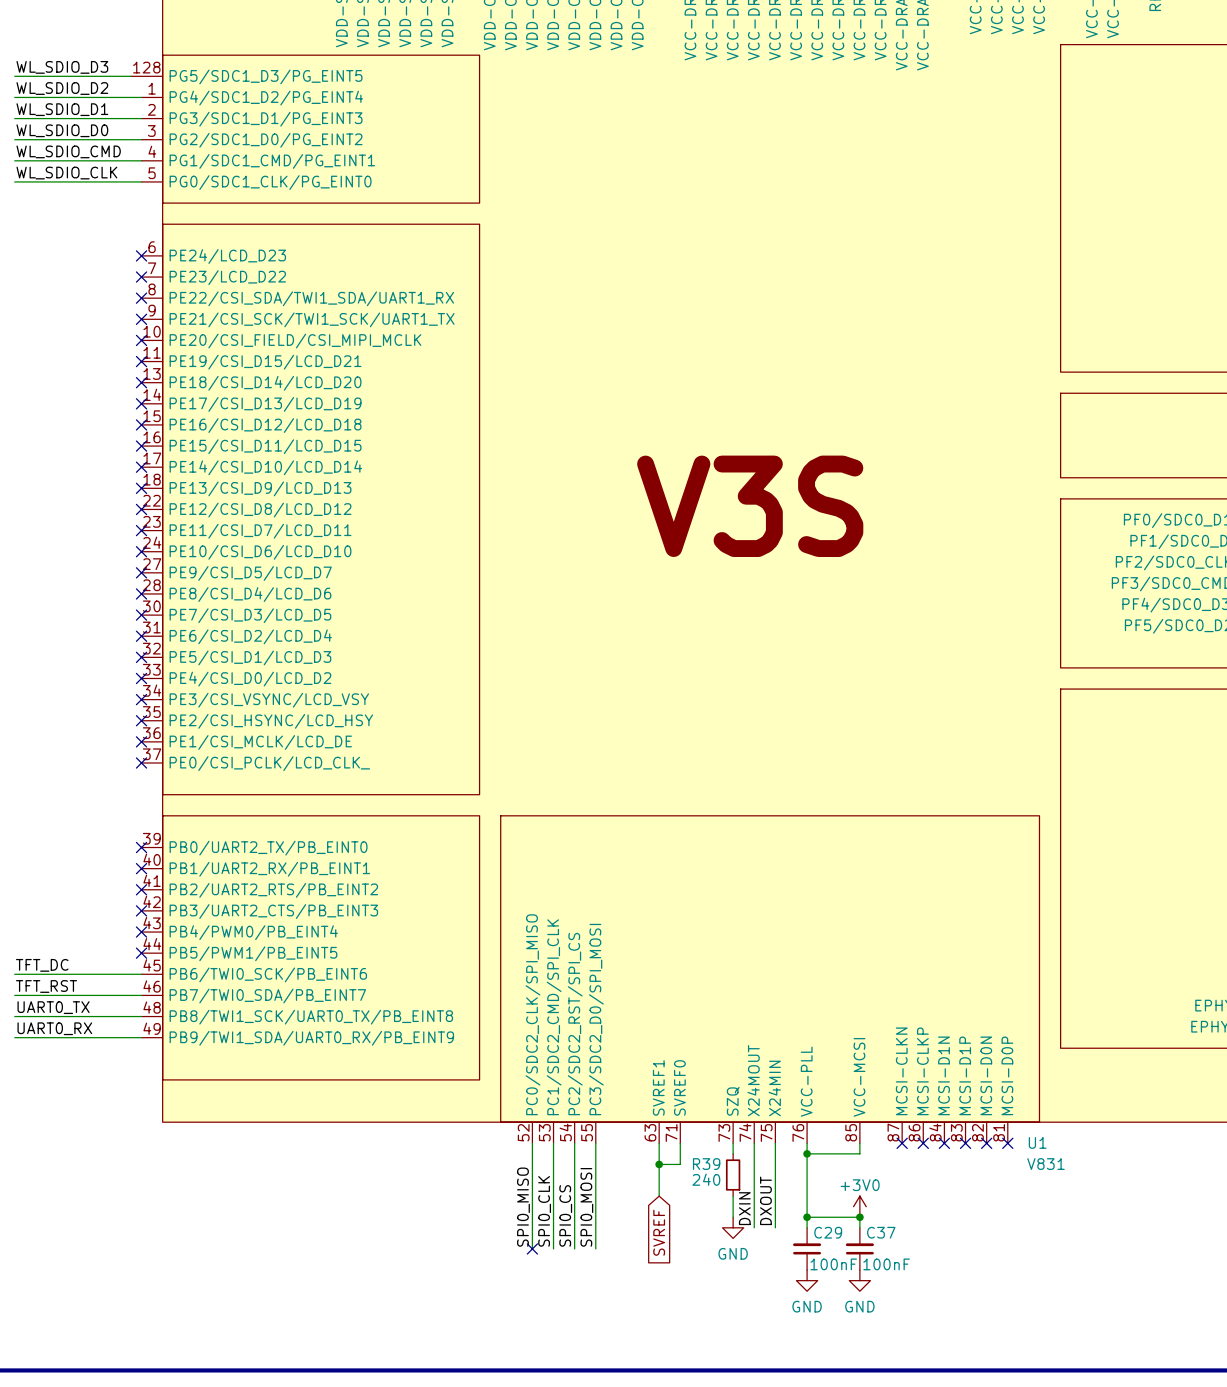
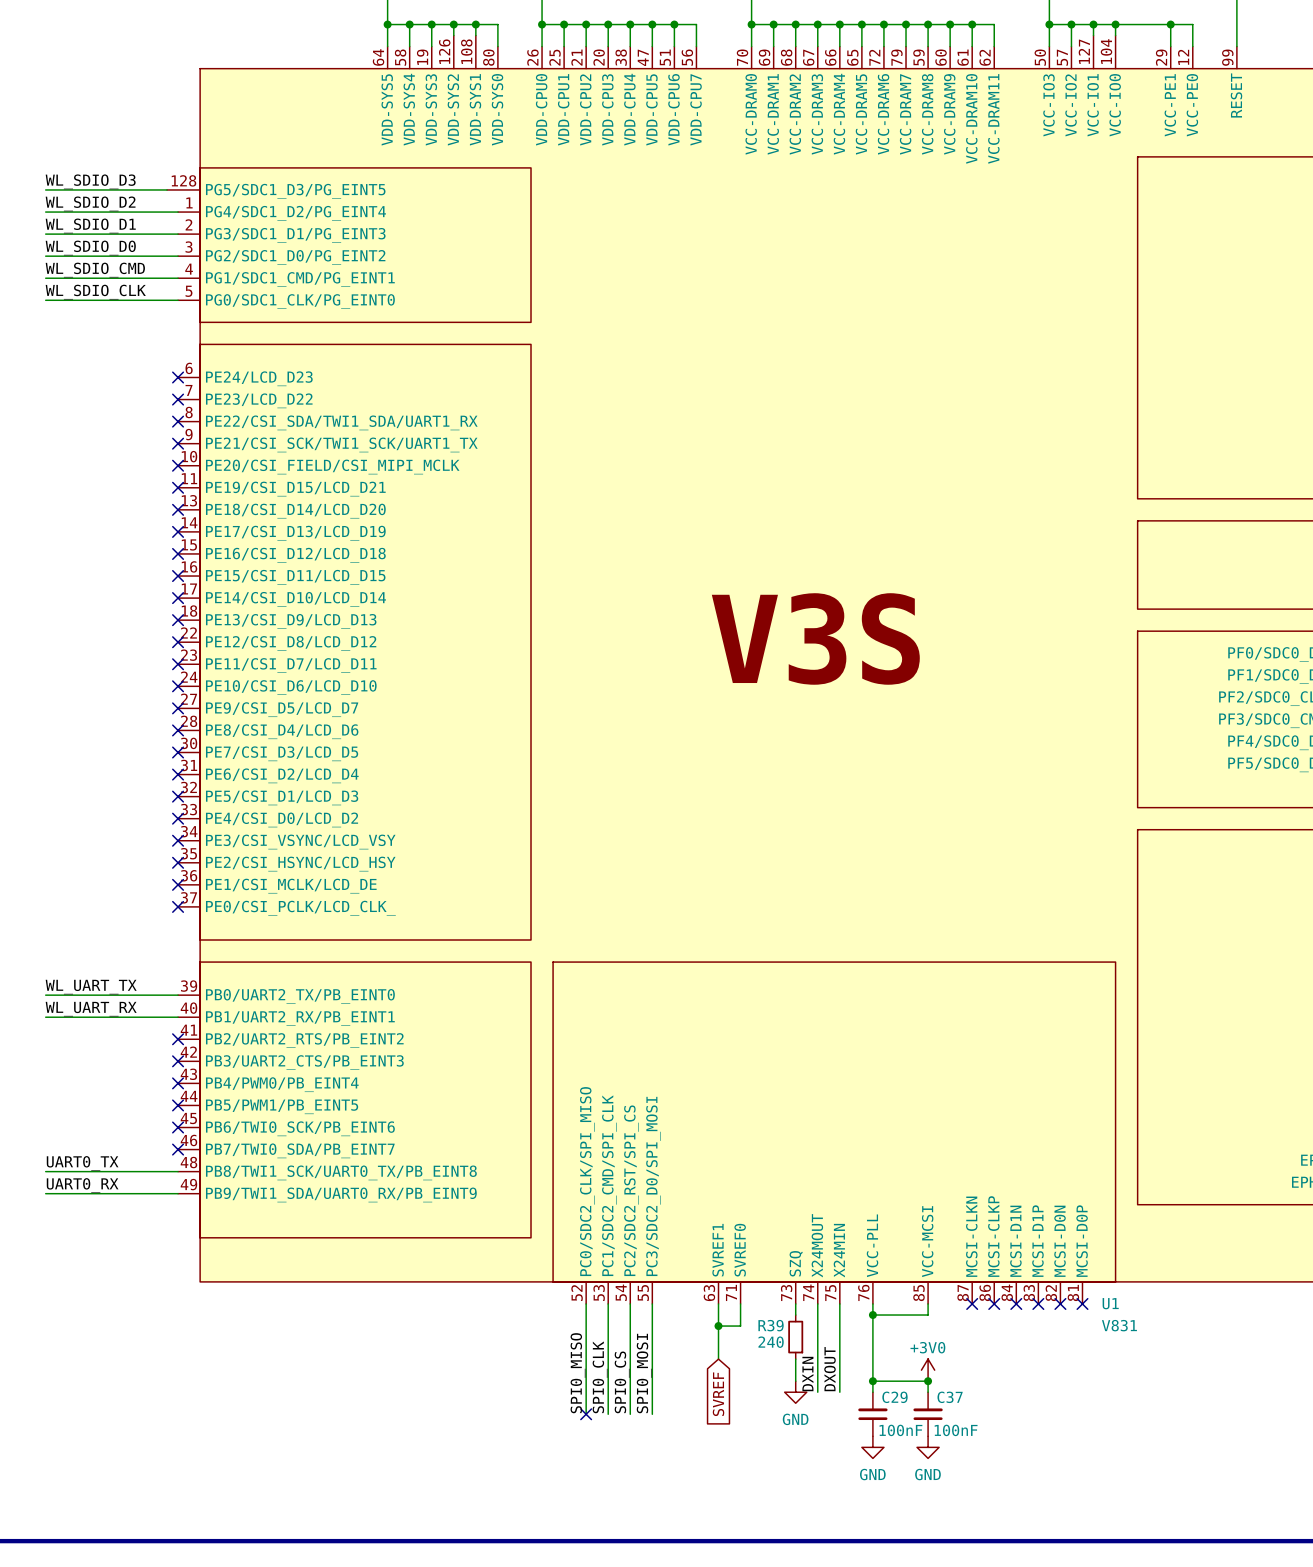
label: none -> WL_UART_TX (91, 987)
no-connect mark: (141, 847) -> none
label: none -> WL_UART_RX (91, 1009)
no-connect mark: (141, 868) -> none
label: TFT_DC (42, 965) -> none
wire: (14, 974) (141, 974) -> (45, 1017) (178, 1017)
no-connect mark: none -> (178, 1127)
label: TFT_RST (46, 986) -> none
wire: (14, 995) (141, 995) -> (45, 995) (178, 995)
no-connect mark: none -> (178, 1149)

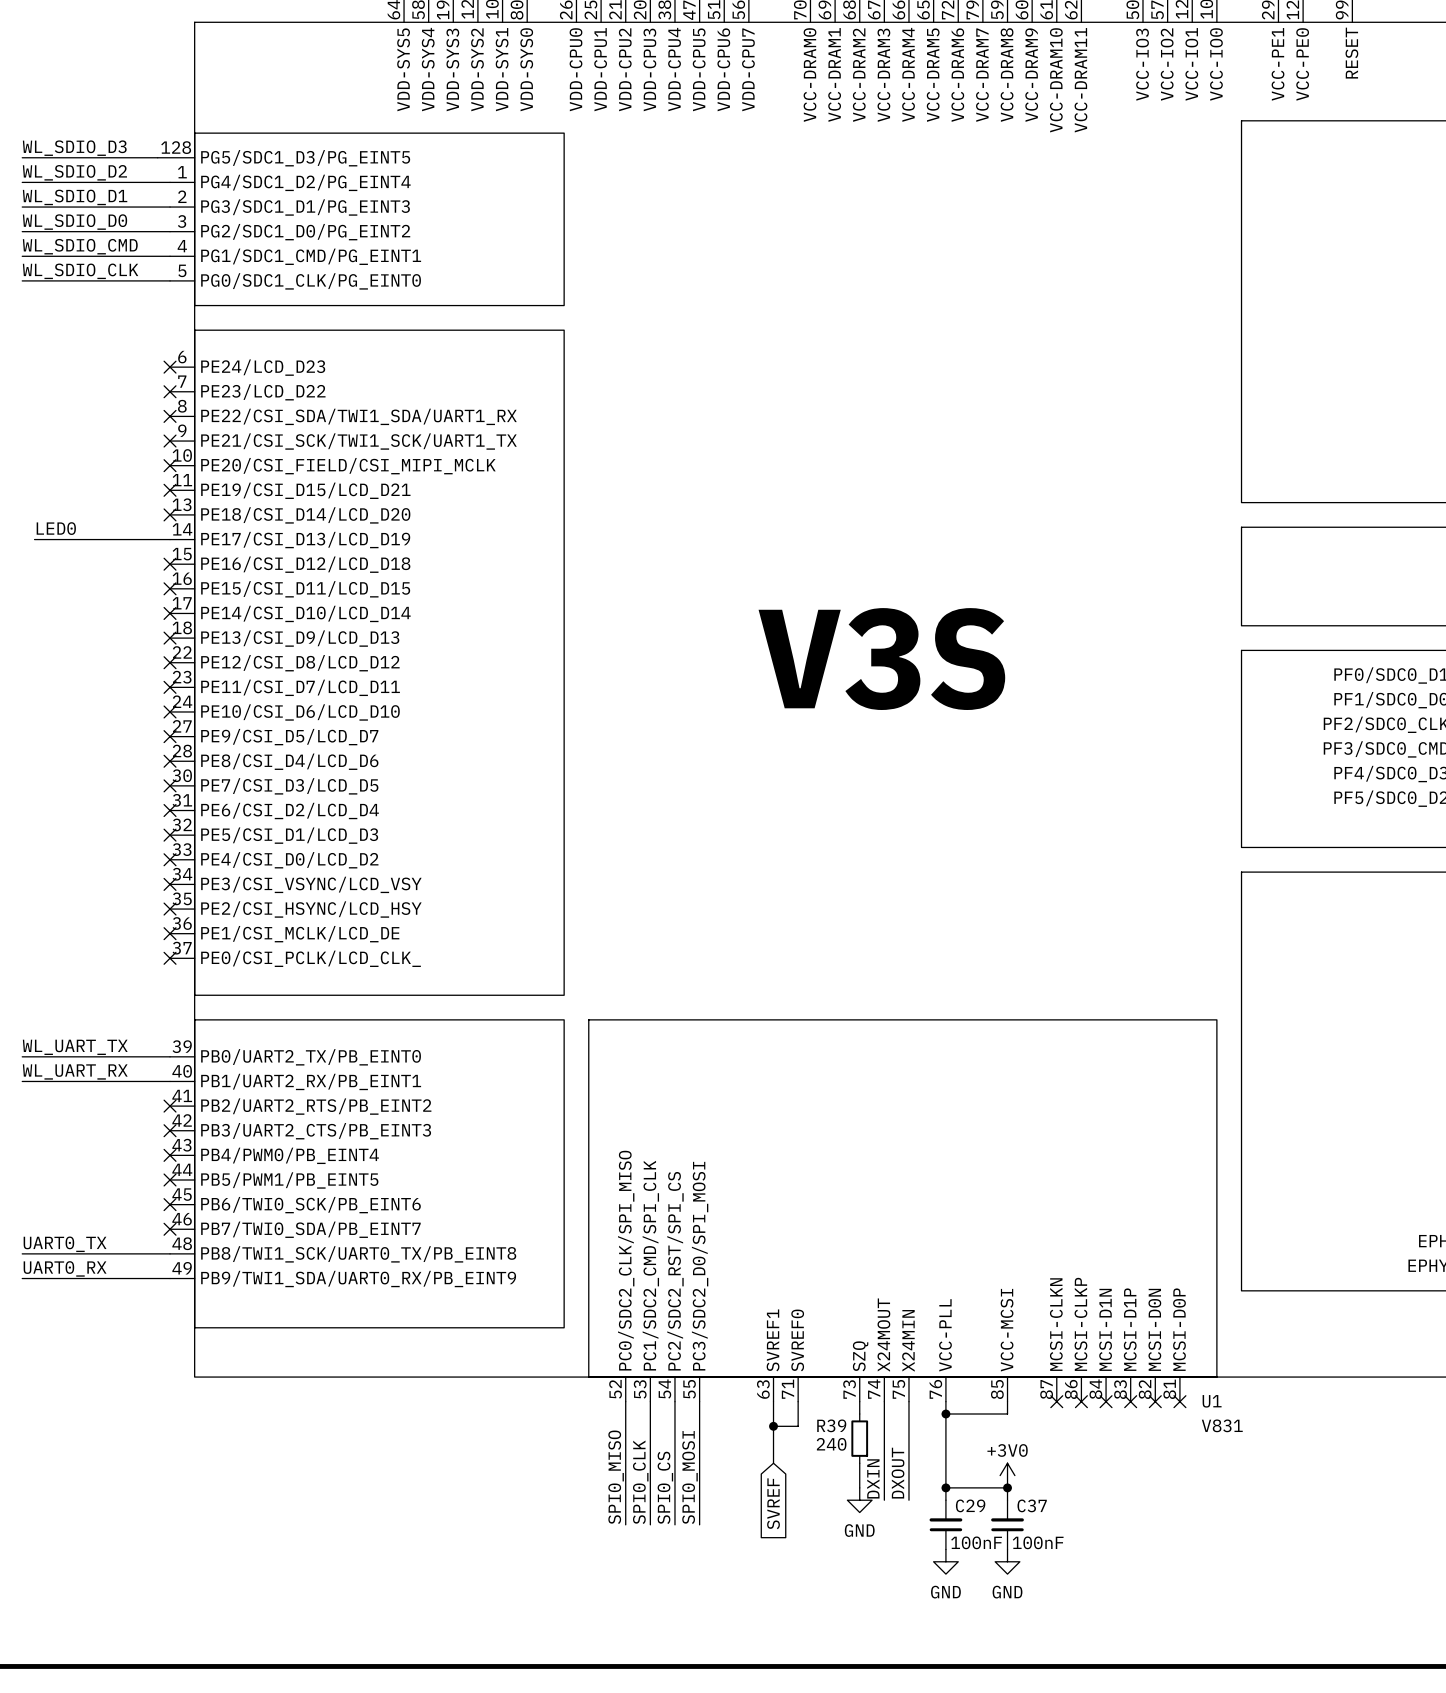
label: none -> LED0 (56, 528)
wire: none -> (34, 539) (170, 539)
no-connect mark: (178, 531) -> none
no-connect mark: (586, 1414) -> none

